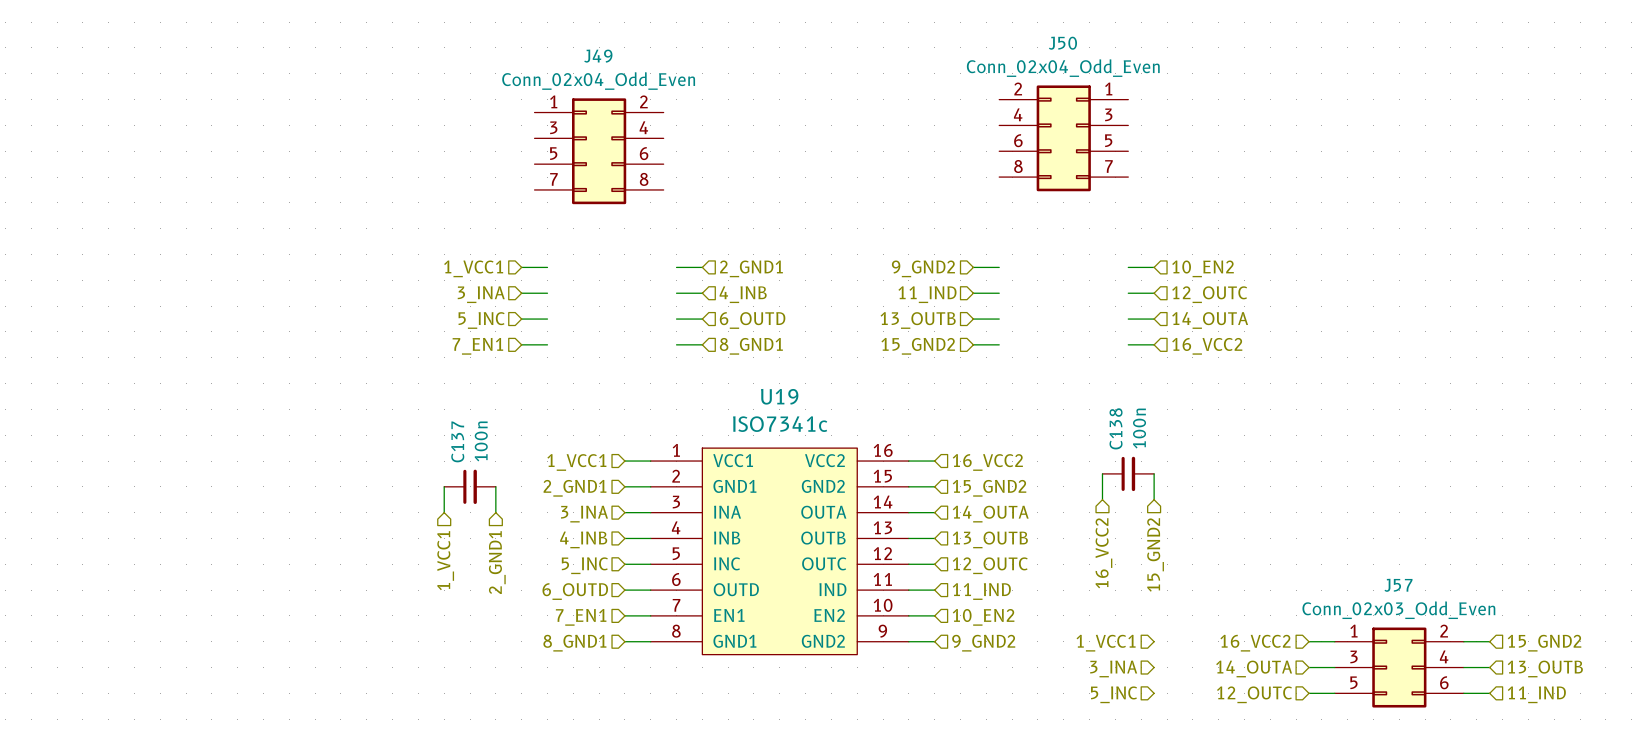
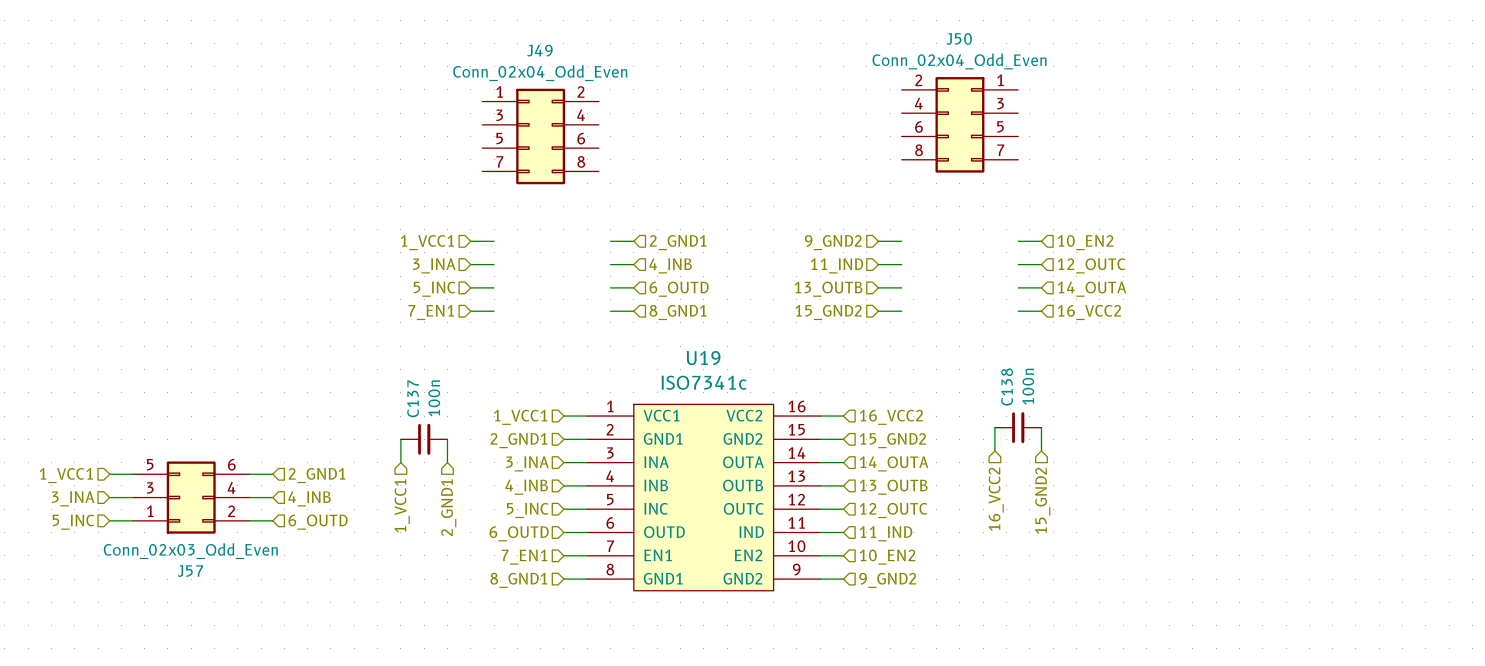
wire: none -> (109, 474) (132, 474)
wire: none -> (249, 474) (272, 474)
hierarchical label: none -> 1_VCC1 (66, 475)
hierarchical label: none -> 2_GND1 (317, 475)
wire: none -> (109, 497) (132, 497)
wire: none -> (249, 497) (272, 497)
hierarchical label: none -> 3_INA (73, 498)
hierarchical label: none -> 4_INB (309, 498)
wire: none -> (109, 520) (132, 520)
wire: none -> (249, 520) (272, 520)
hierarchical label: none -> 5_INC (73, 522)
hierarchical label: none -> 6_OUTD (318, 522)
wire: (1309, 641) (1334, 641) -> none
wire: (1463, 641) (1489, 641) -> none
hierarchical label: 1_VCC1 (1106, 643) -> none
hierarchical label: 16_VCC2 (1255, 643) -> none
hierarchical label: 15_GND2 (1544, 643) -> none
wire: (1309, 667) (1334, 667) -> none
J57 flip: as is (1399, 667) -> up-down (191, 497)
J57 position: (1399, 667) -> (191, 497)
wire: (1463, 667) (1489, 667) -> none
hierarchical label: 3_INA (1113, 668) -> none
hierarchical label: 14_OUTA (1254, 668) -> none
hierarchical label: 13_OUTB (1545, 668) -> none
wire: (1309, 693) (1334, 693) -> none
wire: (1463, 693) (1489, 693) -> none
hierarchical label: 5_INC (1114, 694) -> none
hierarchical label: 12_OUTC (1254, 694) -> none
hierarchical label: 11_IND (1536, 694) -> none

